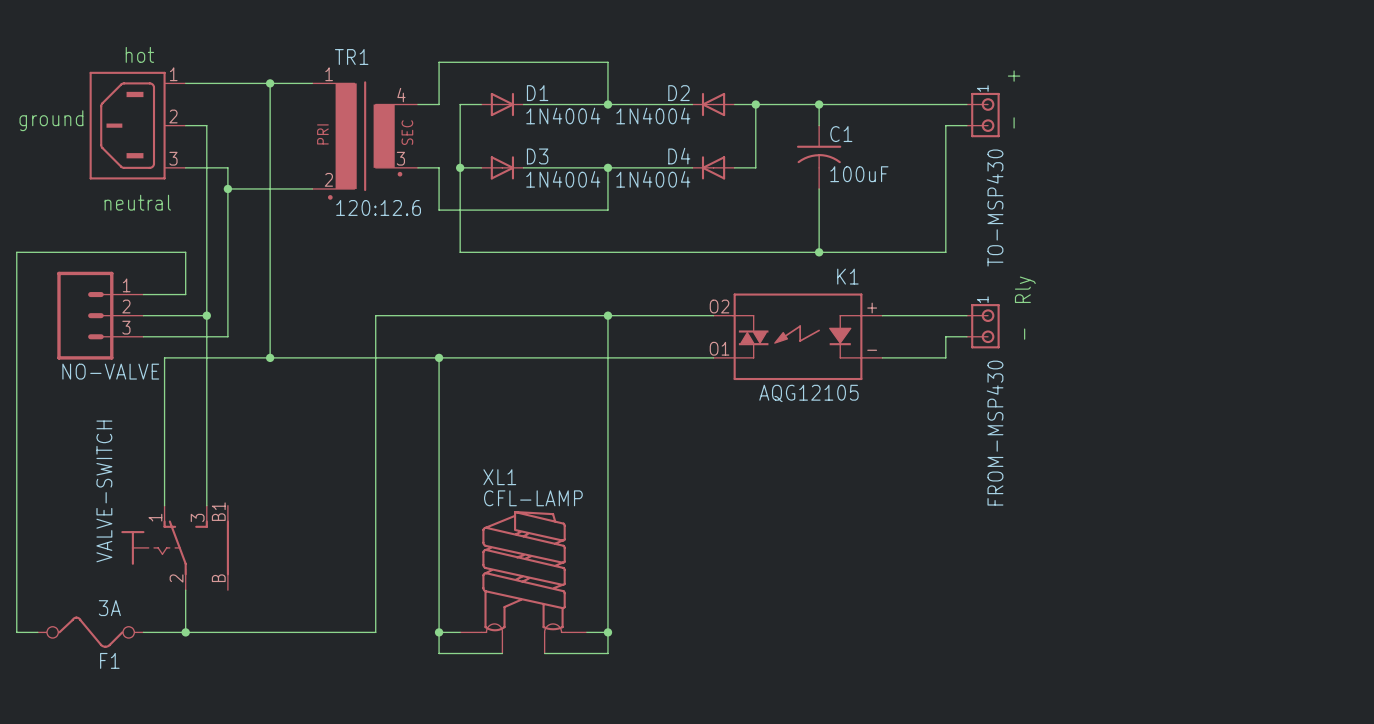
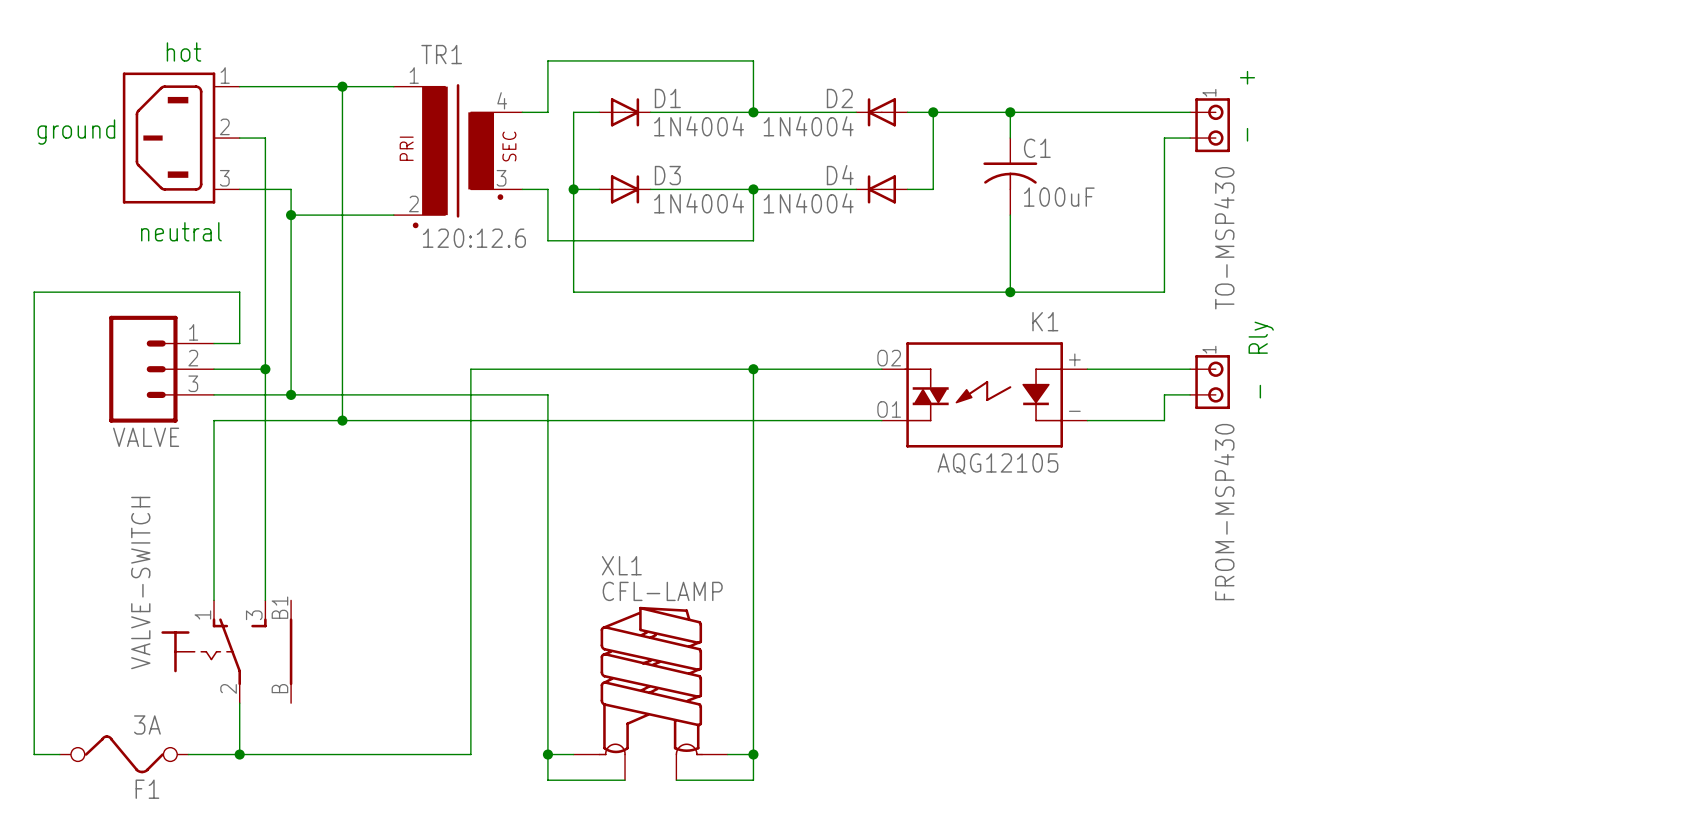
NO-VALVE: (100, 315) -> none
VALVE: none -> (161, 369)
wire: none -> (291, 394) (547, 394) (547, 420)
junction: none -> (291, 394)
junction: (439, 357) -> none

